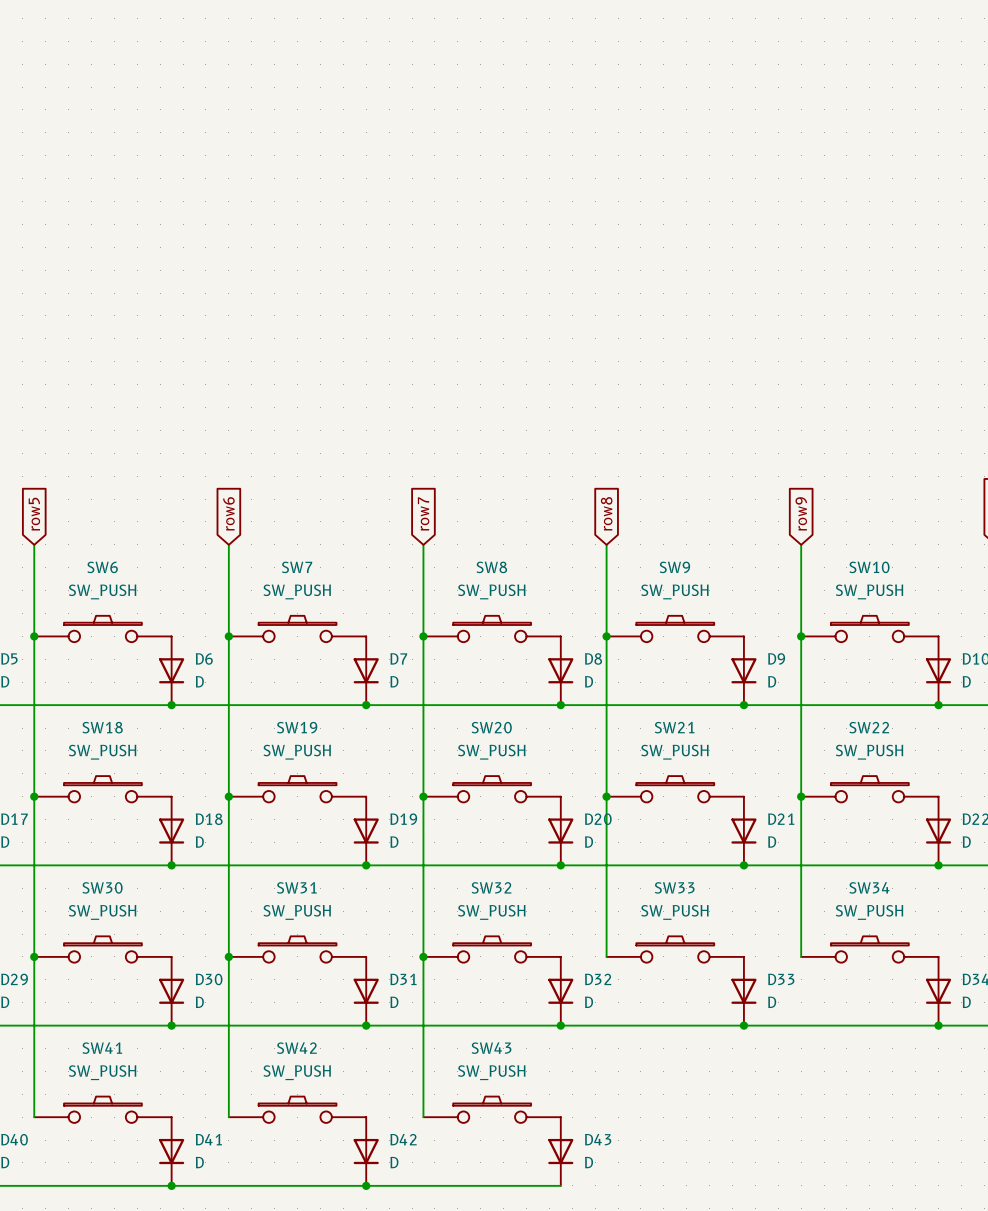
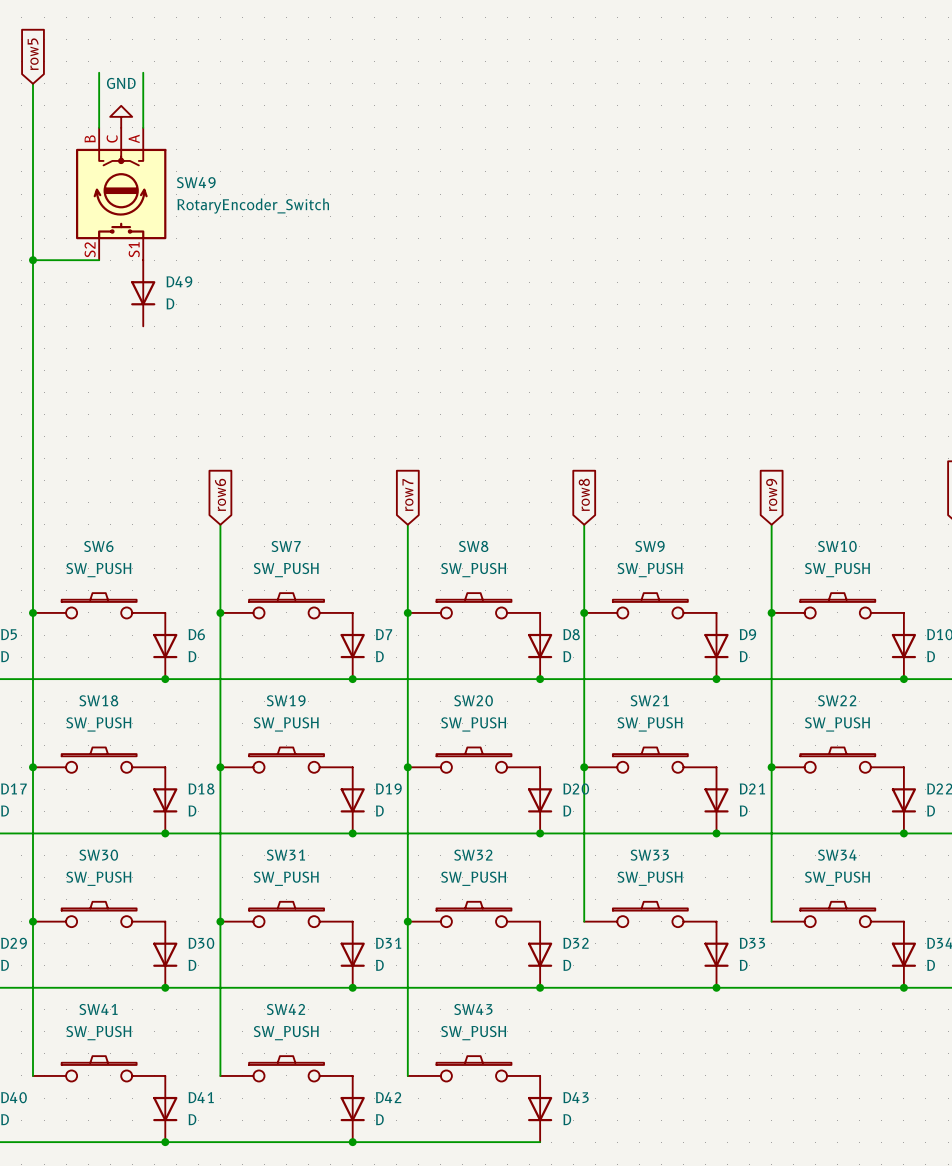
global label: none -> row5 (33, 54)
wire: none -> (99, 72) (99, 127)
wire: none -> (143, 72) (143, 127)
wire: none -> (33, 83) (33, 524)
power symbol: none -> GND (121, 116)
SW49: none -> RotaryEncoder_Switch (121, 194)
wire: none -> (33, 260) (99, 260)
junction: none -> (33, 260)
D49: none -> D (143, 293)
global label: row5 (34, 514) -> none

